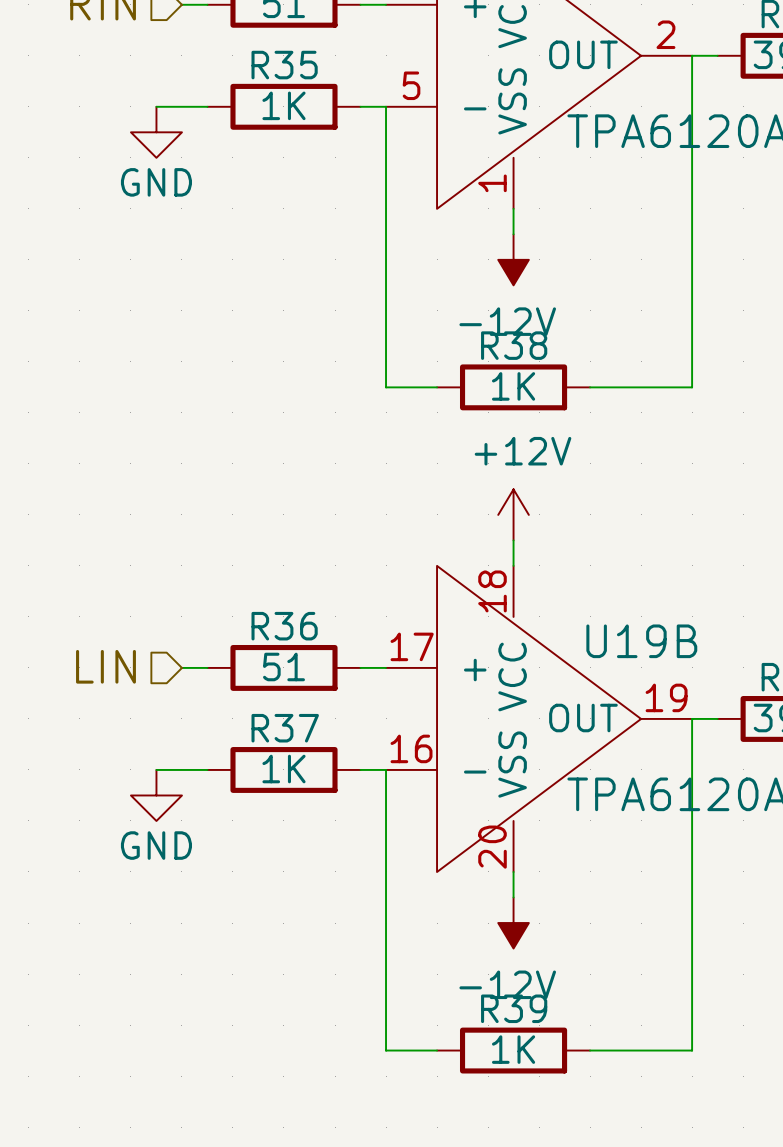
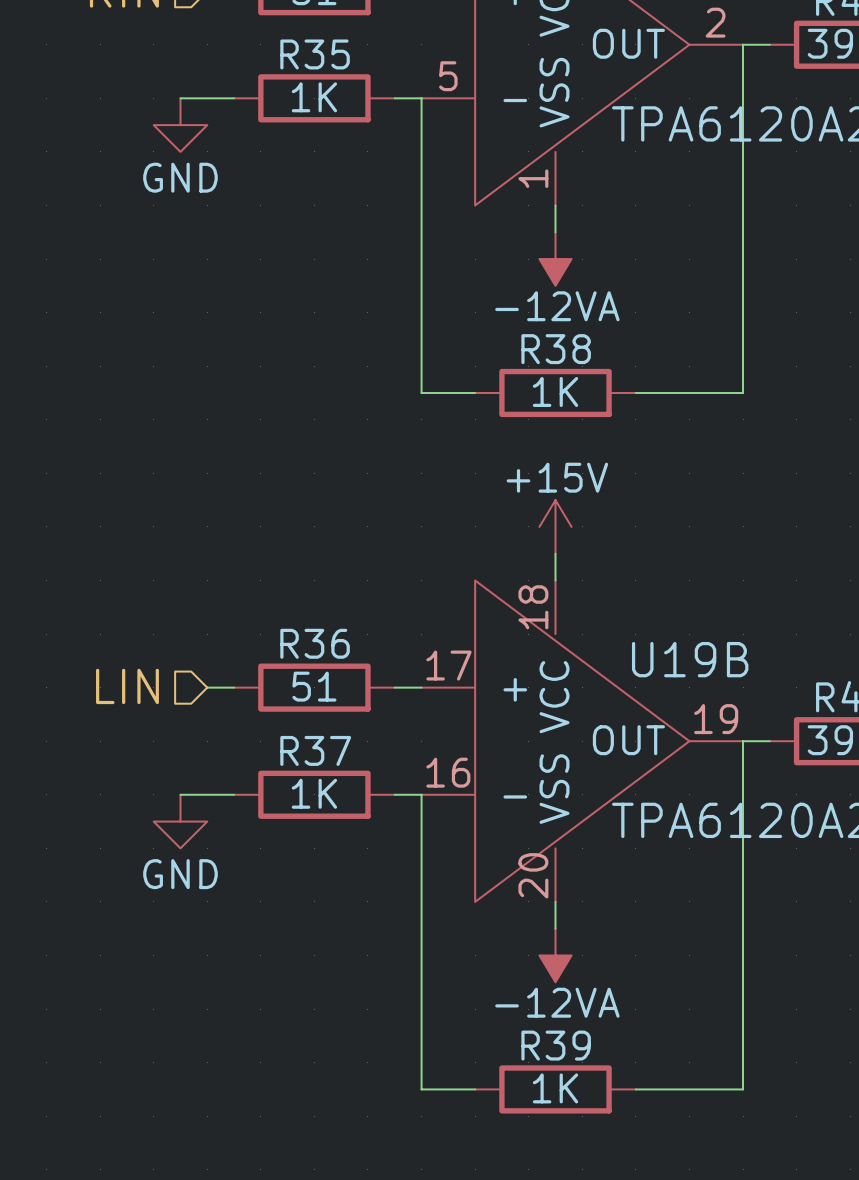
power symbol: -12V (513, 259) -> -12VA (555, 259)
power symbol: +12V (513, 514) -> +15V (555, 526)
power symbol: -12V (513, 923) -> -12VA (555, 955)

